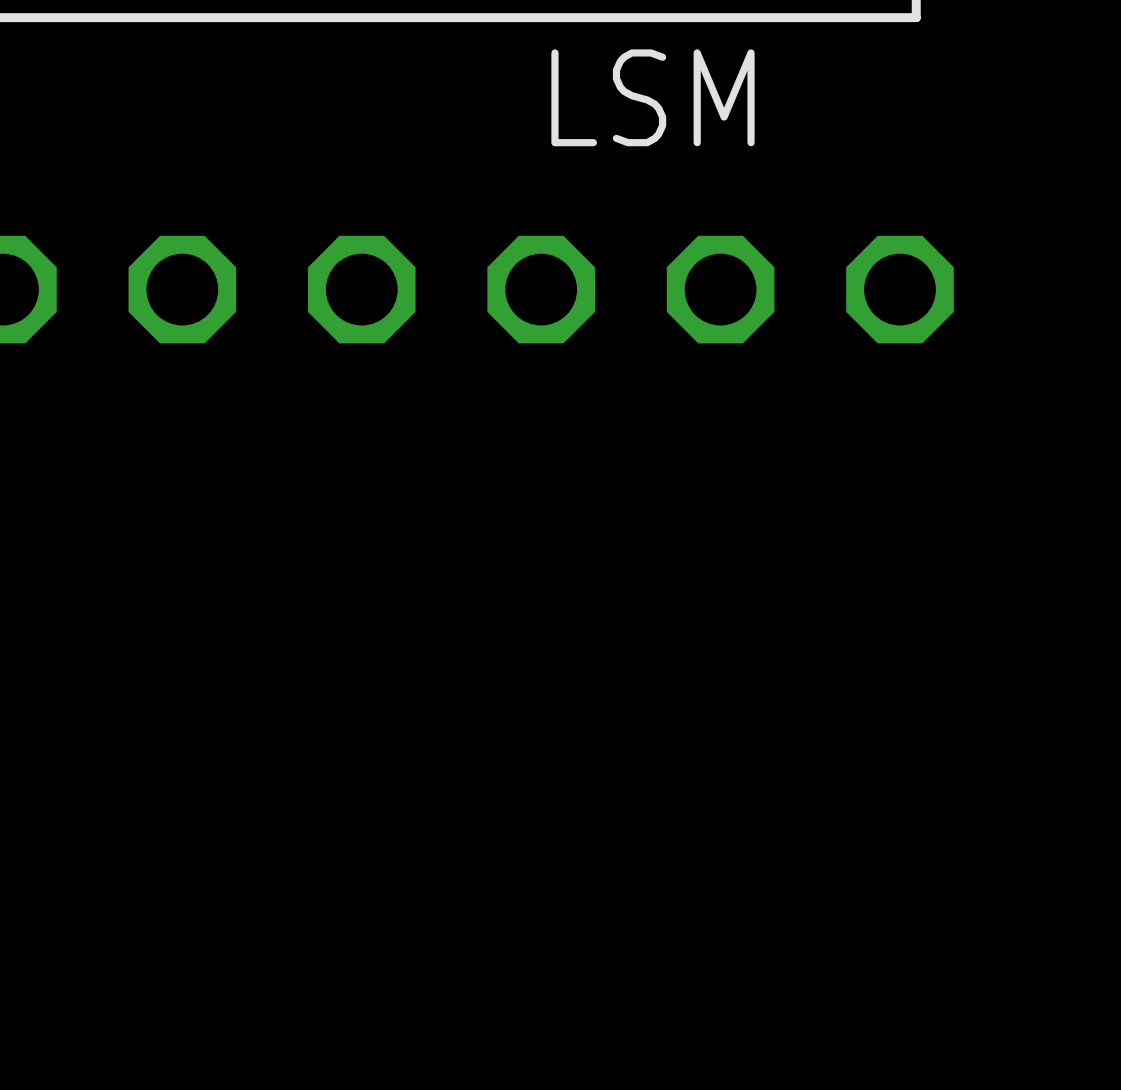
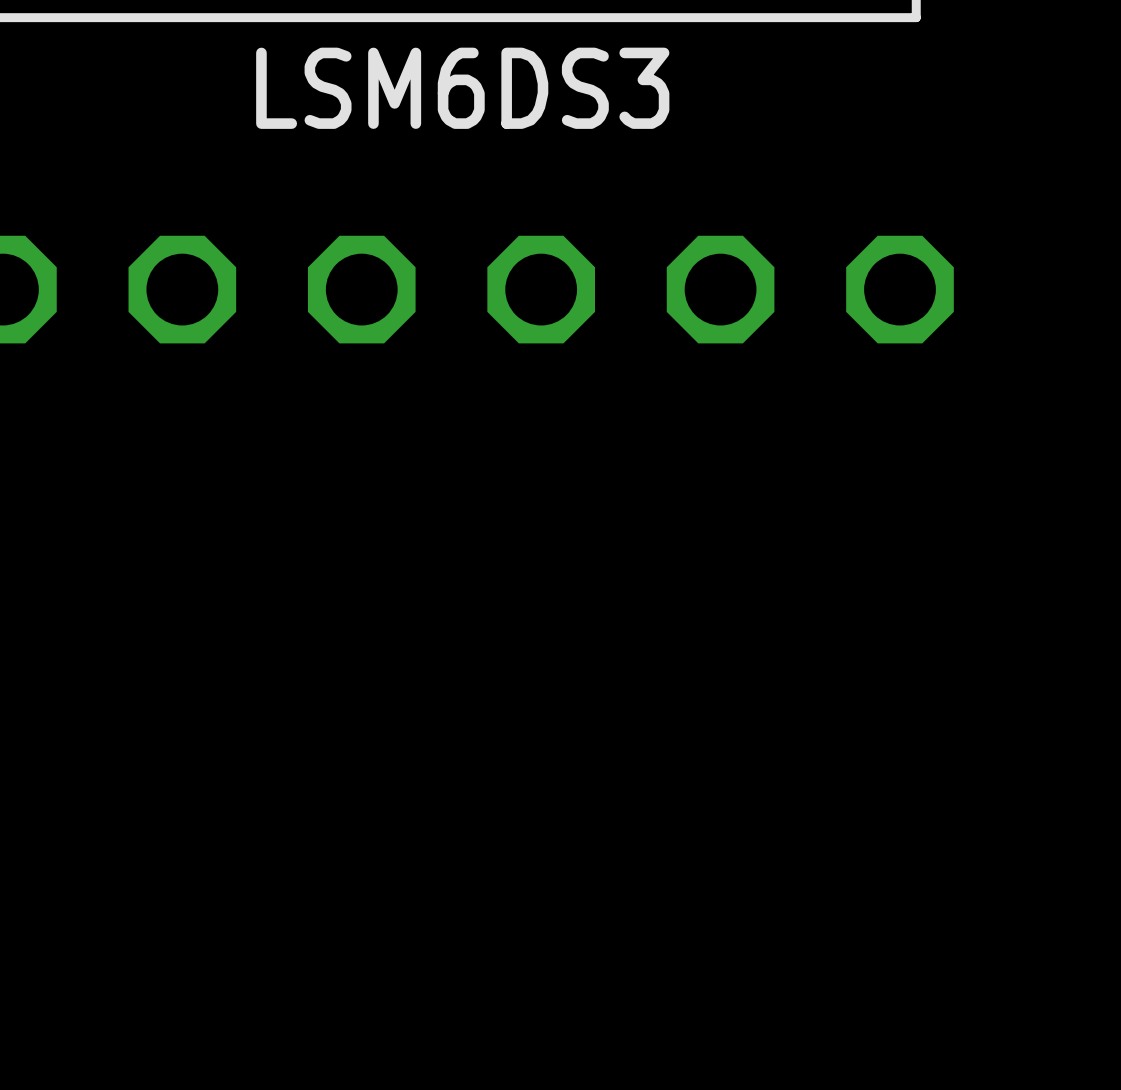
LSM name: LSM (652, 97) -> LSM6DS3 (462, 88)

